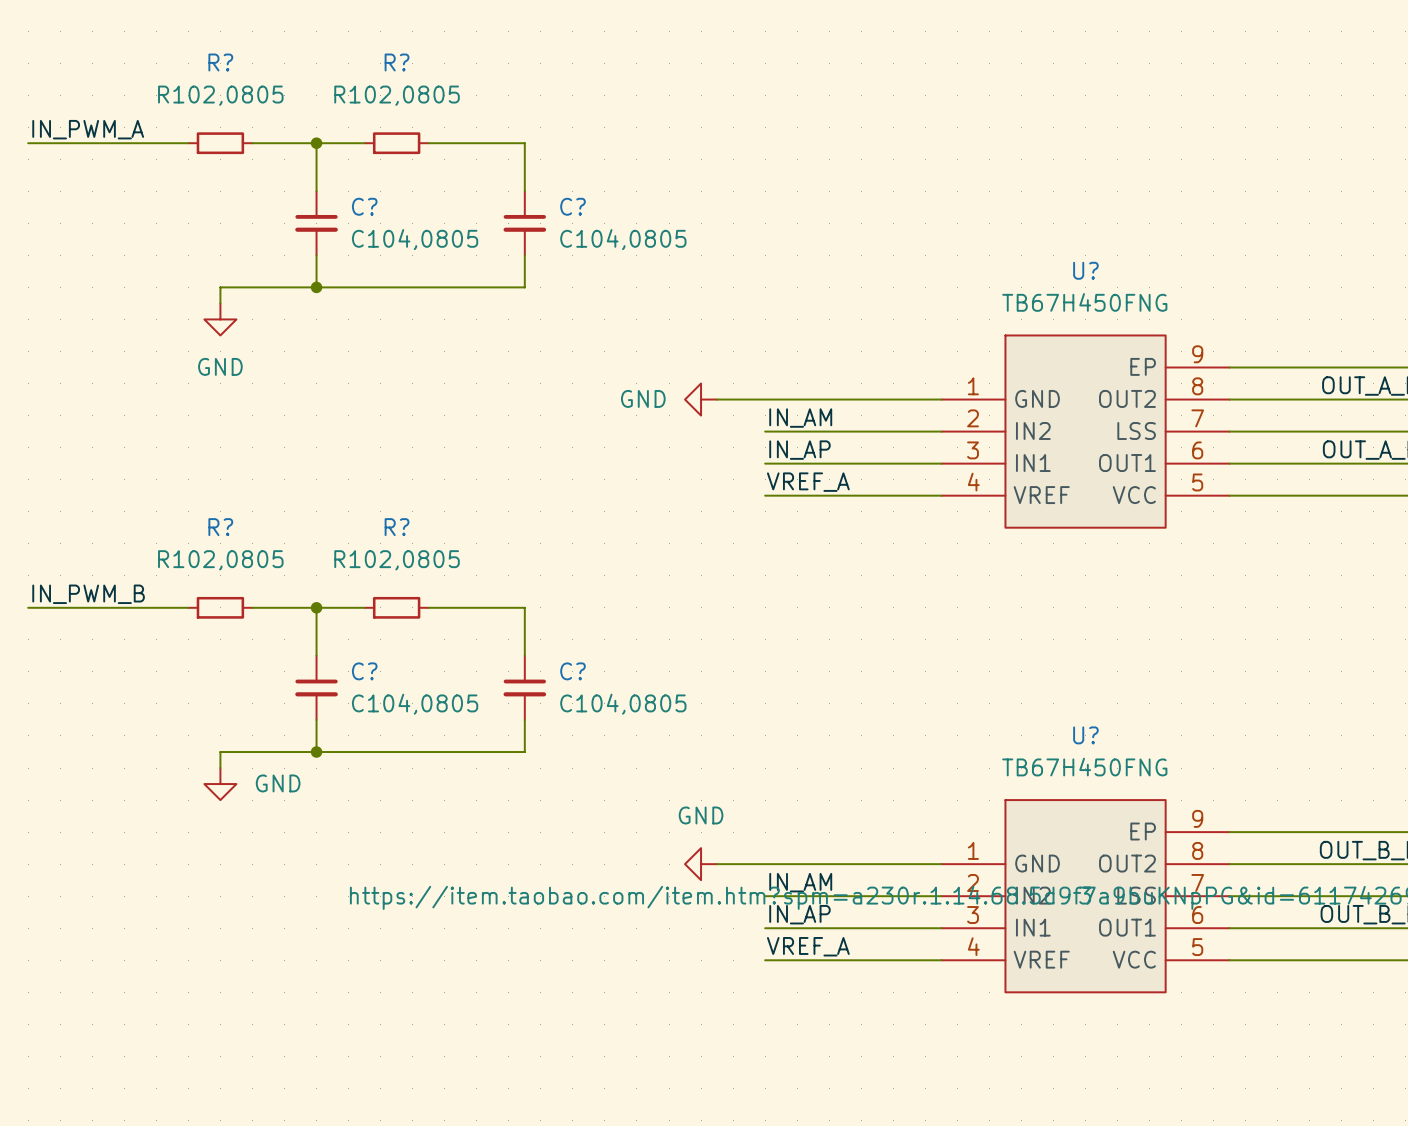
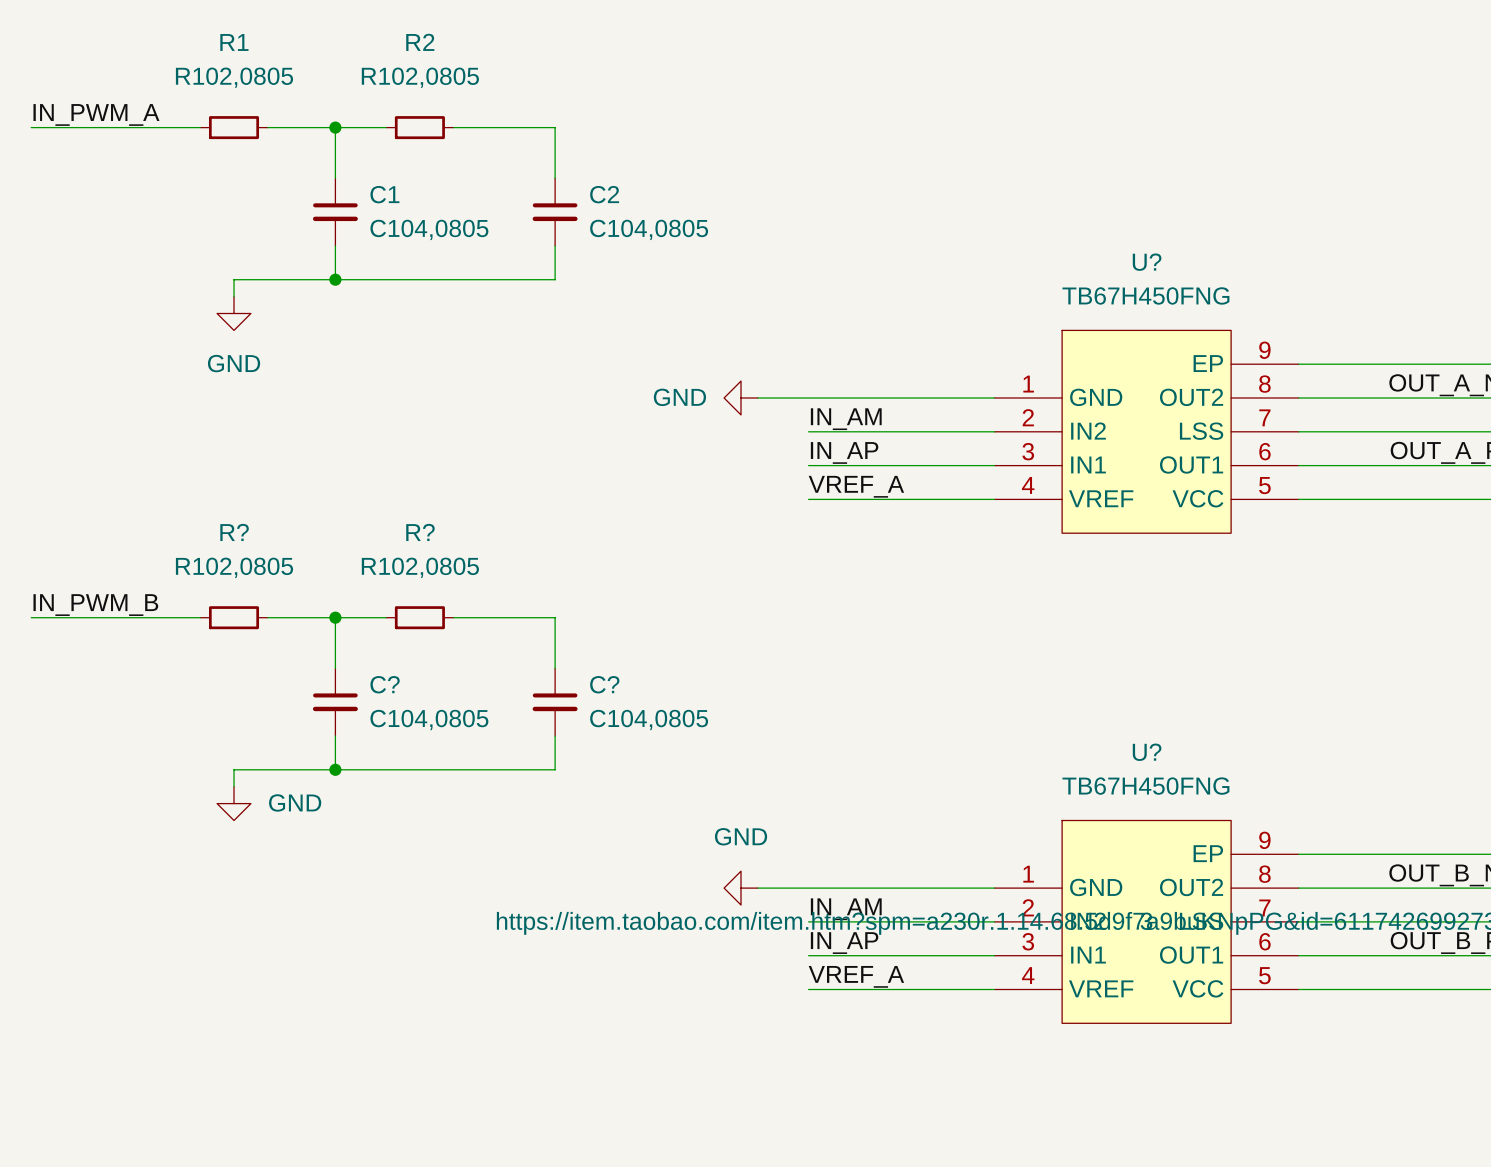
R? name: R? (220, 62) -> R1 (234, 42)
R? name: R? (397, 62) -> R2 (420, 42)
C? name: C? (364, 206) -> C1 (384, 194)
C? name: C? (573, 206) -> C2 (604, 194)

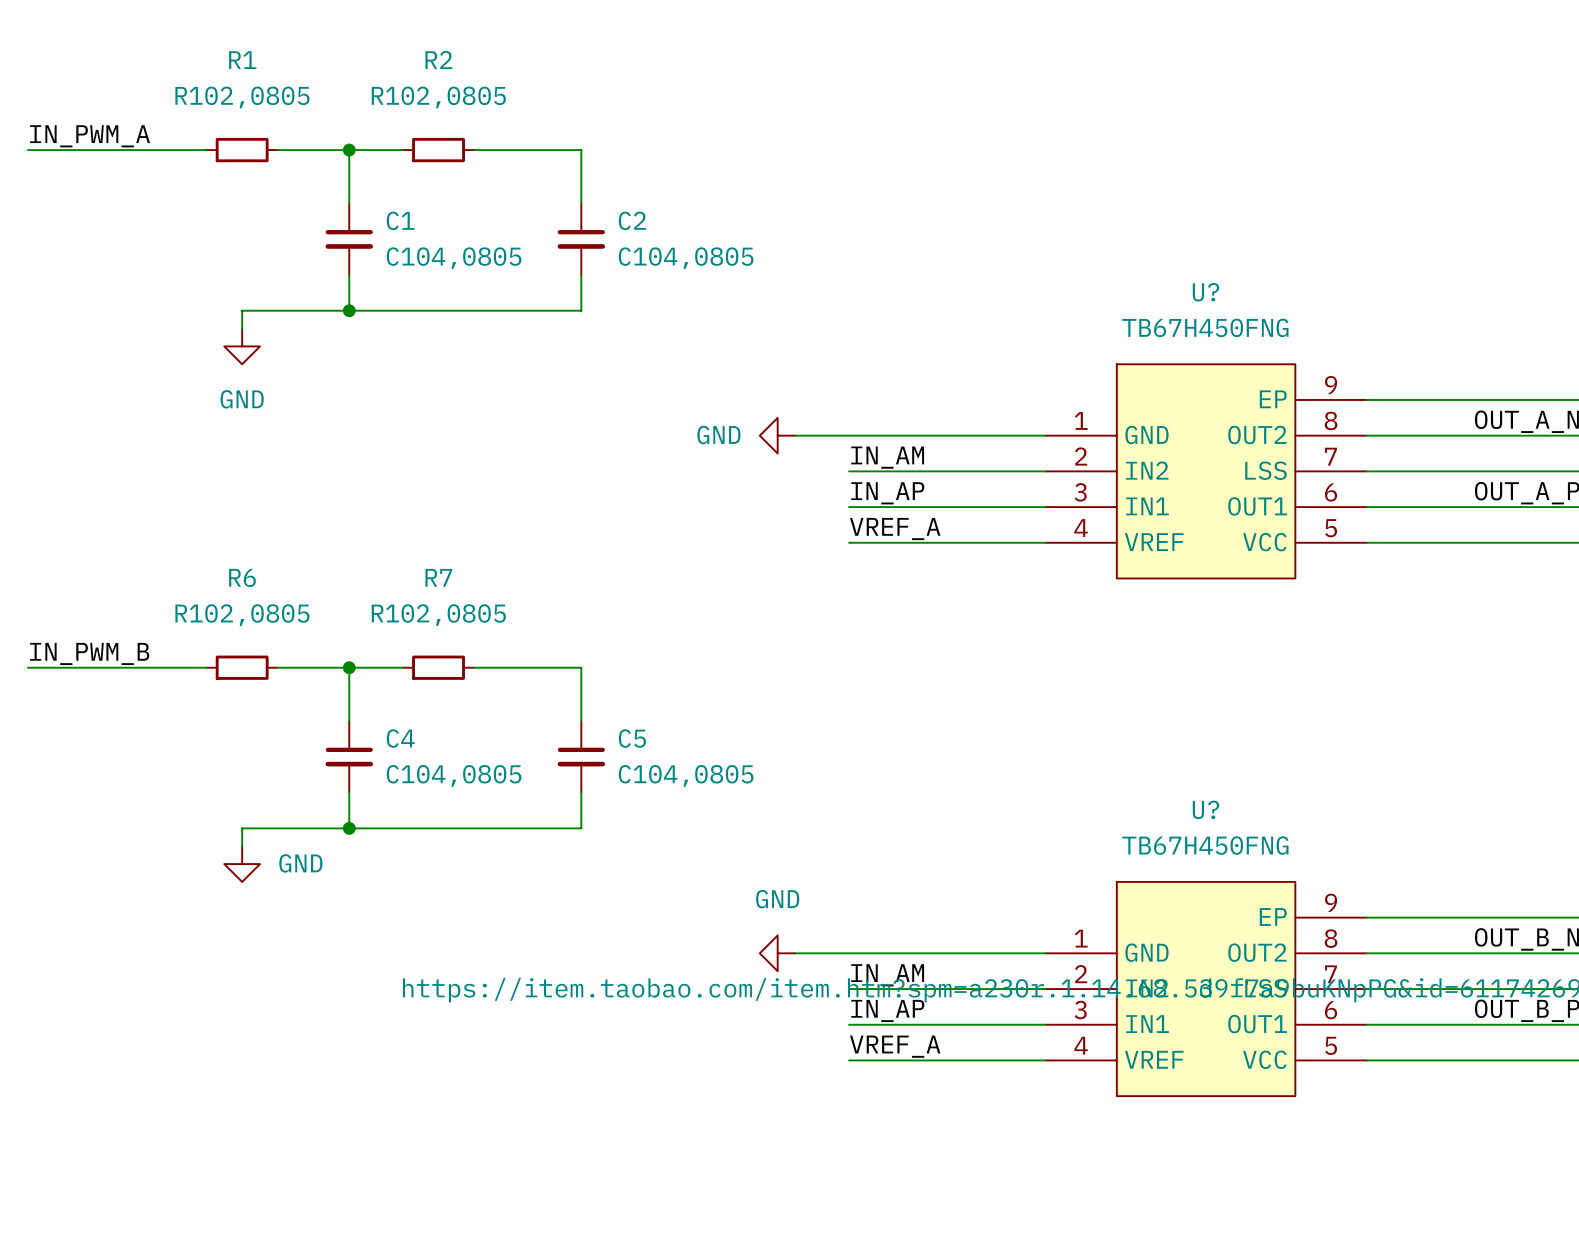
R? name: R? (234, 532) -> R6 (242, 577)
R? name: R? (420, 532) -> R7 (438, 577)
C? name: C? (385, 684) -> C4 (400, 738)
C? name: C? (604, 684) -> C5 (632, 738)

